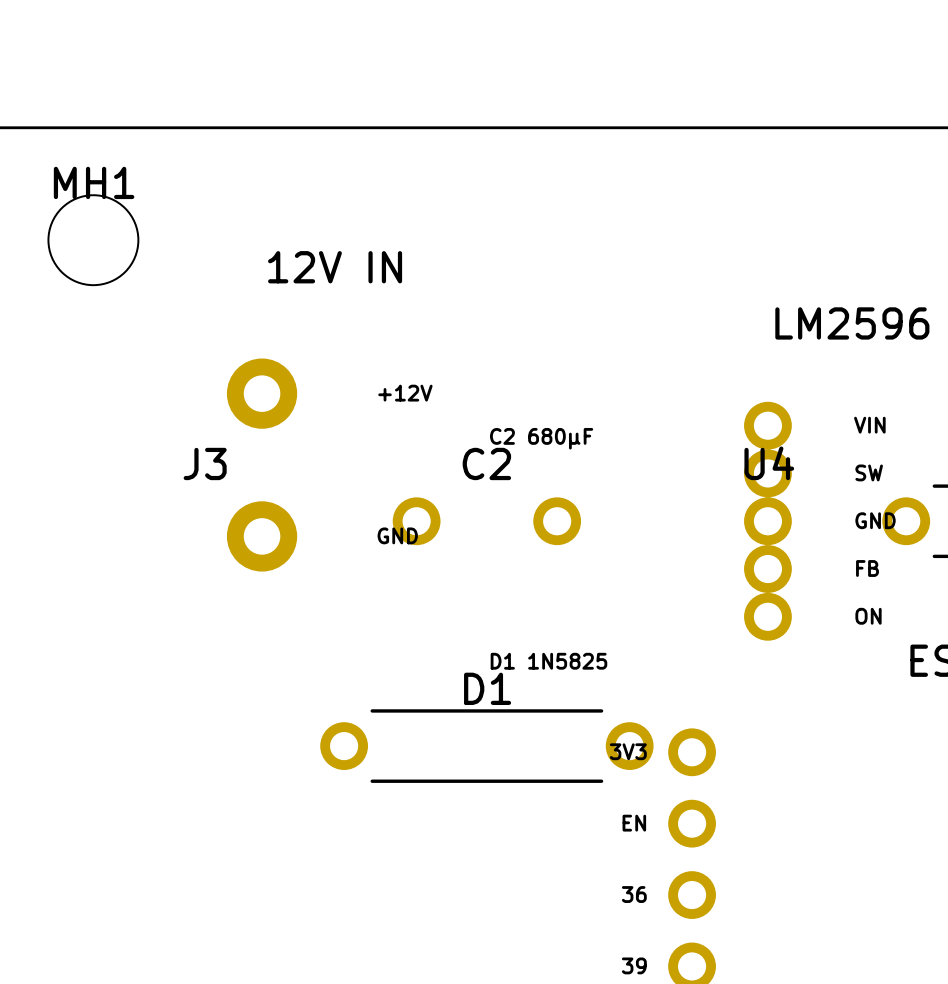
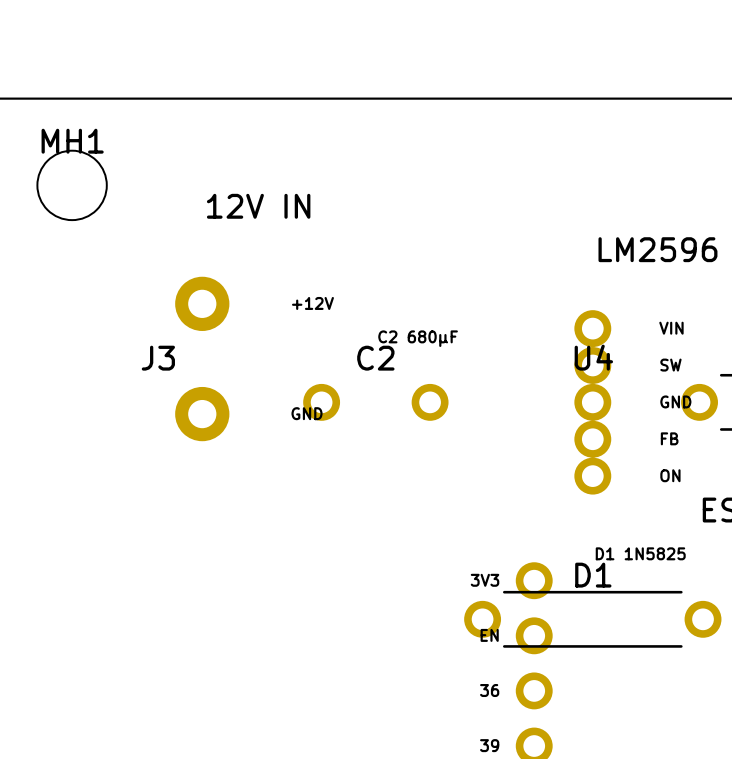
text position: D1 1N5825 (548, 661) -> D1 1N5825 (640, 553)
D1 position: (486, 746) -> (592, 619)

